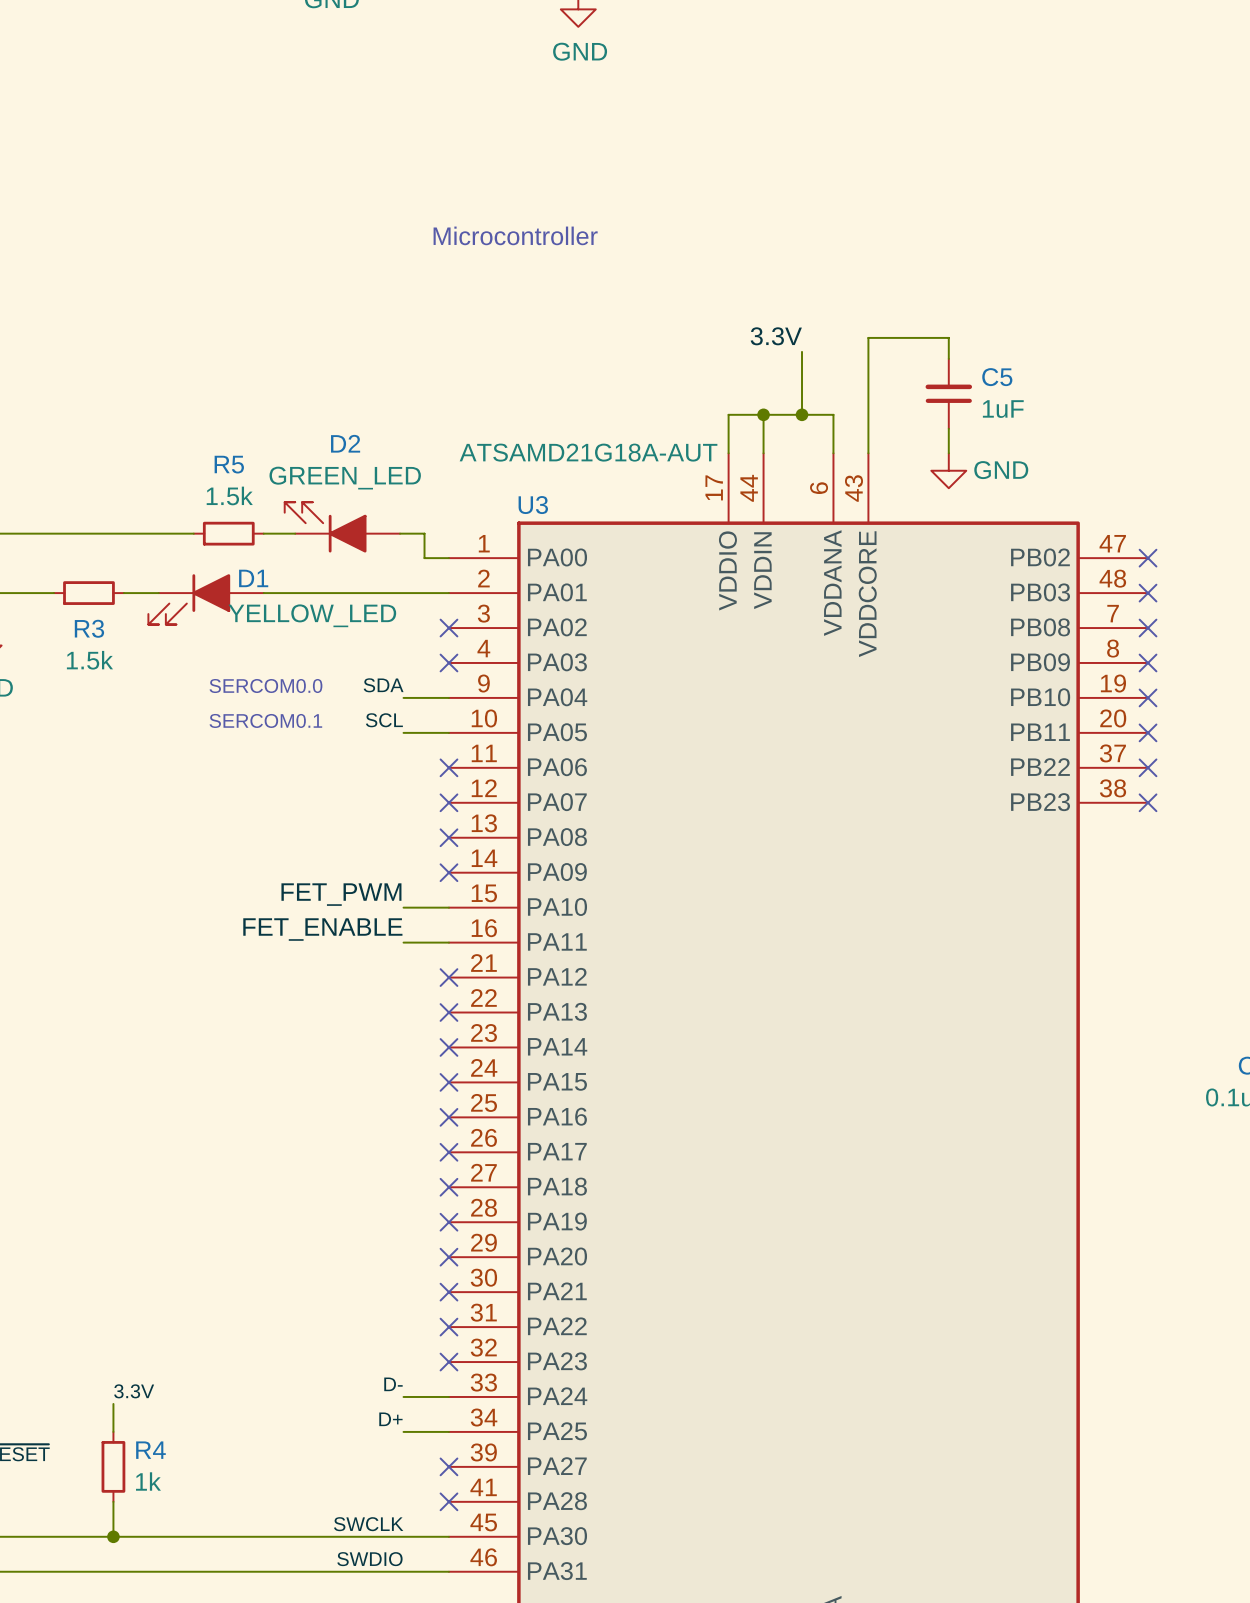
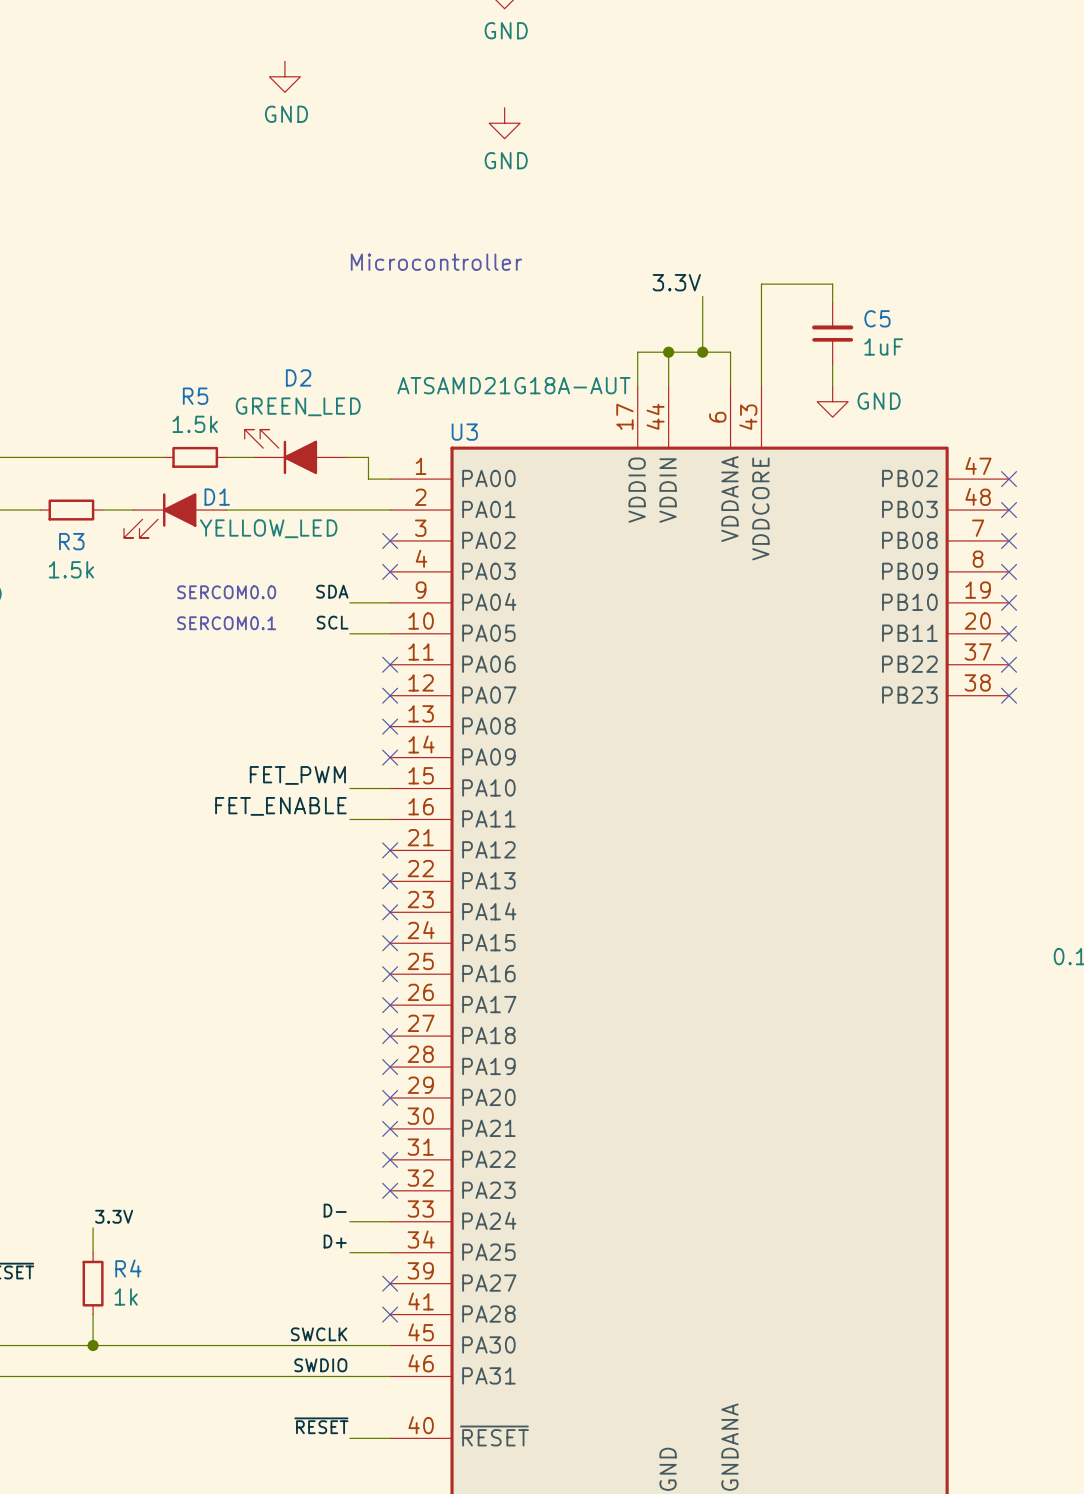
power symbol: none -> GND (284, 76)
power symbol: none -> GND (504, 123)
text position: Microcontroller (515, 235) -> Microcontroller (436, 262)

